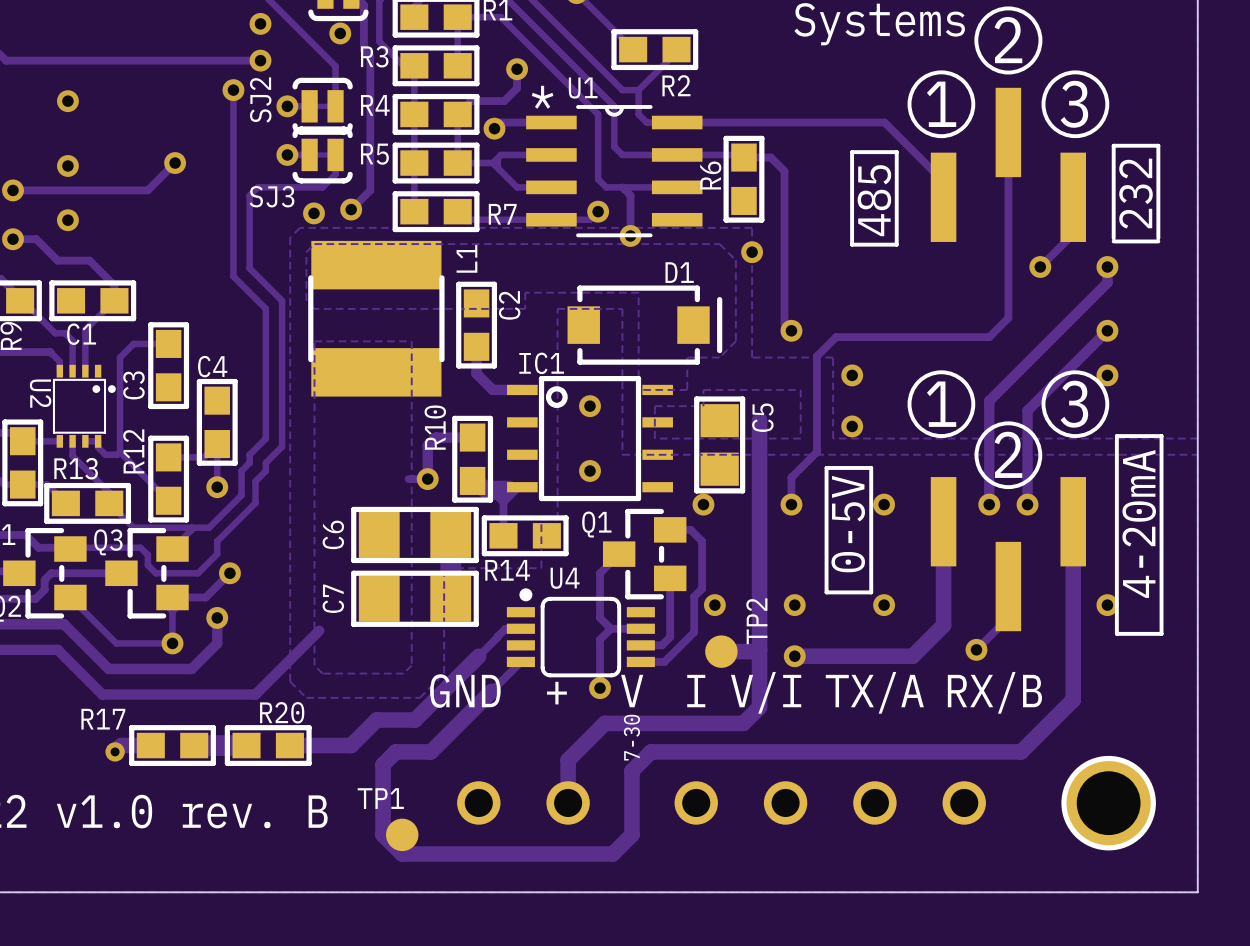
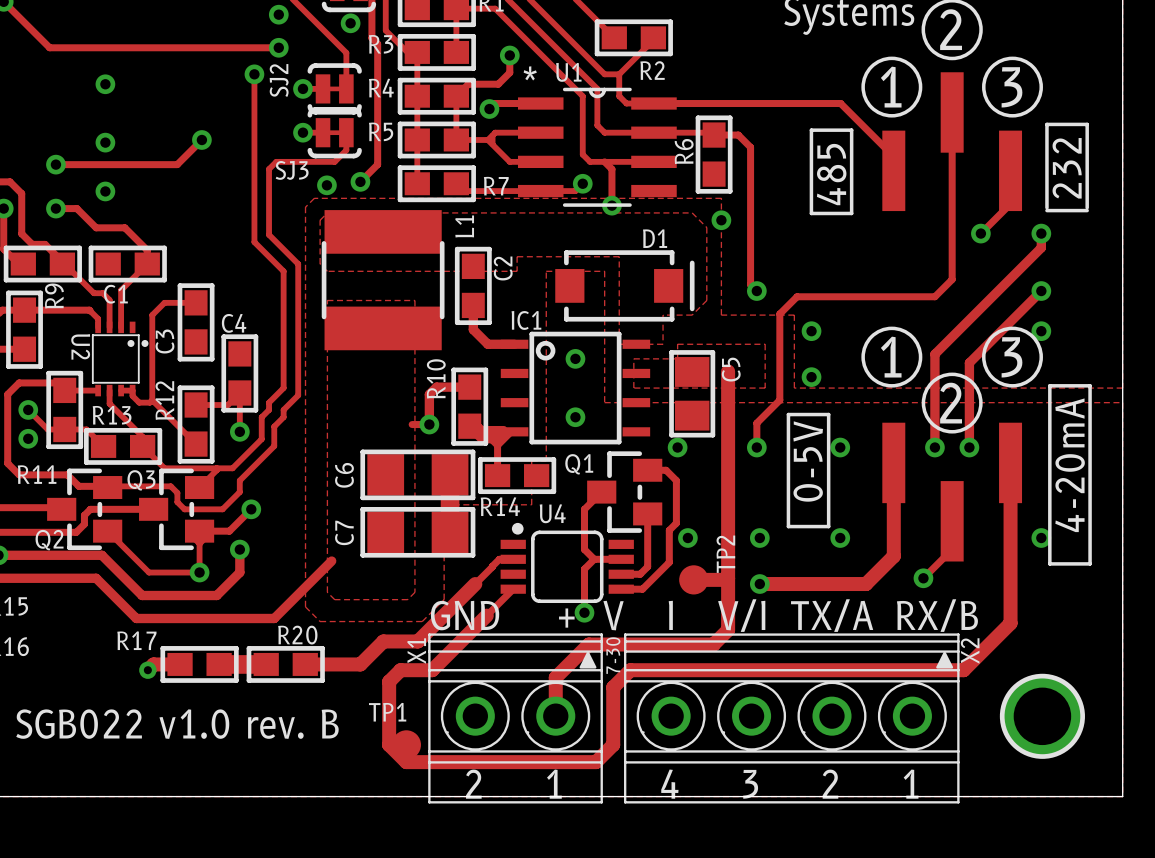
X1 side: bottom (523, 802) -> top (515, 718)
X2 side: bottom (830, 802) -> top (791, 718)

